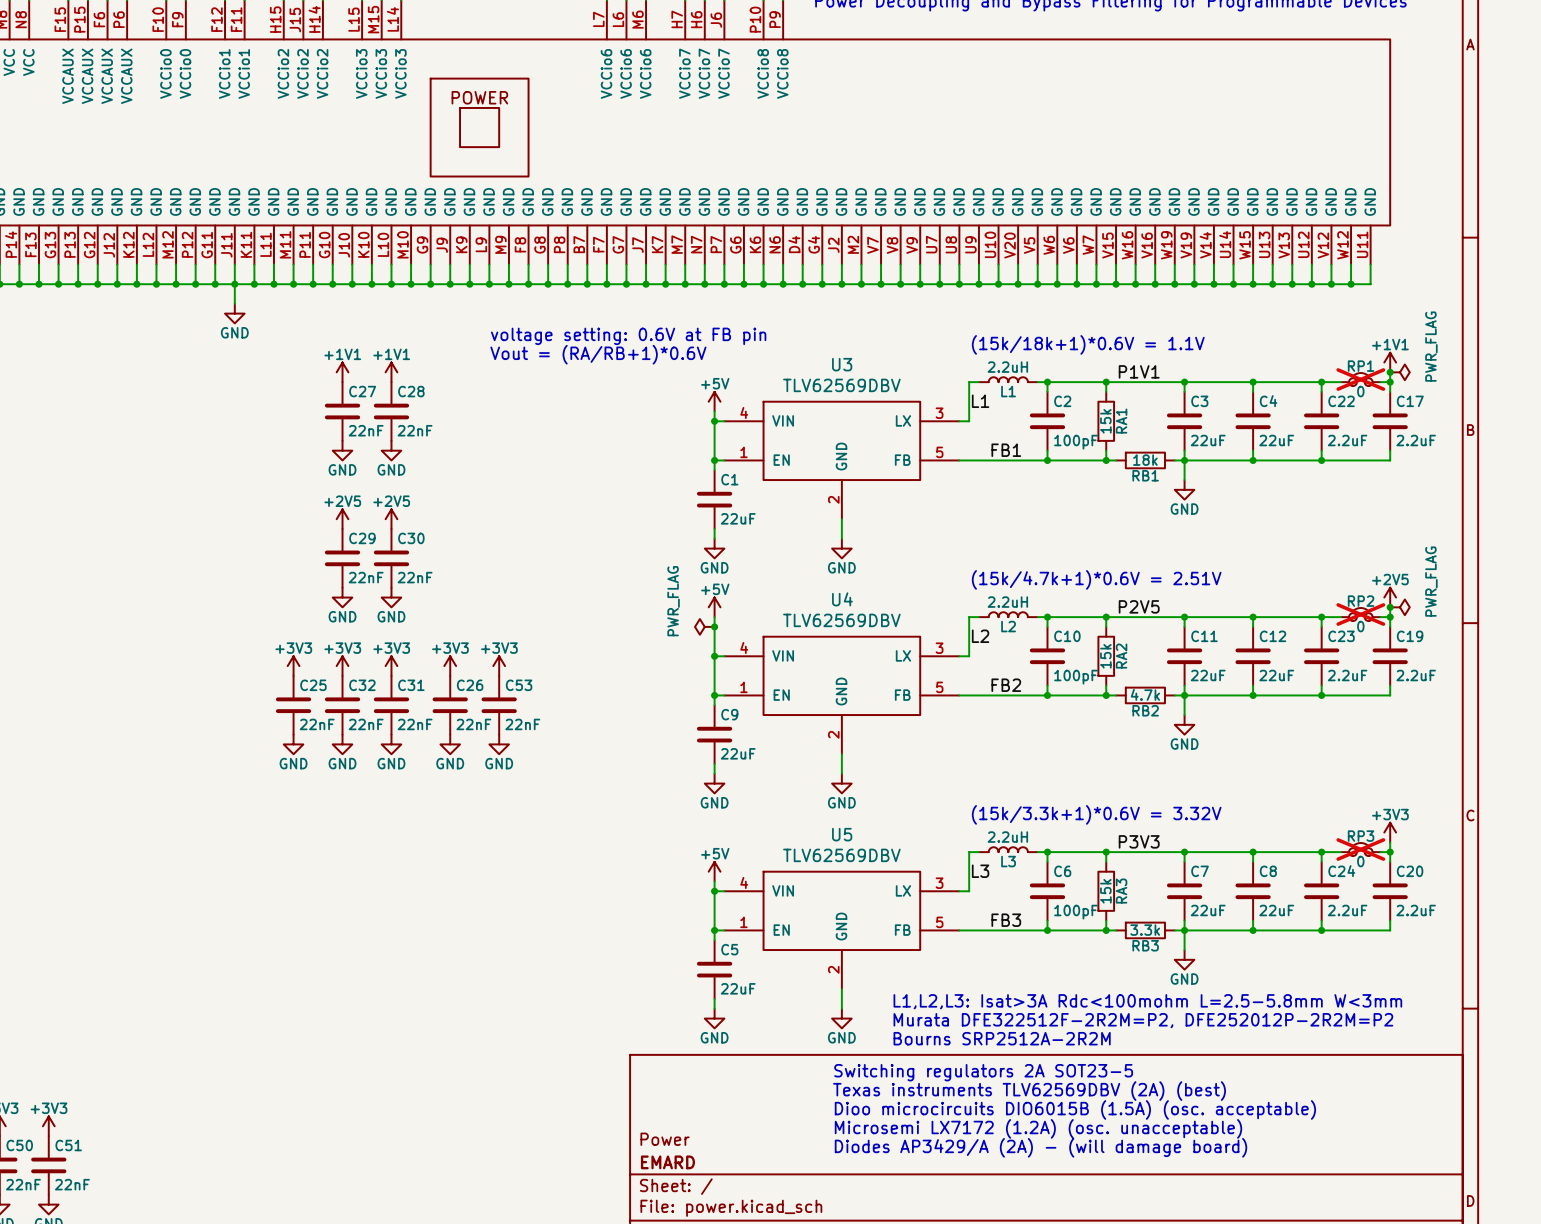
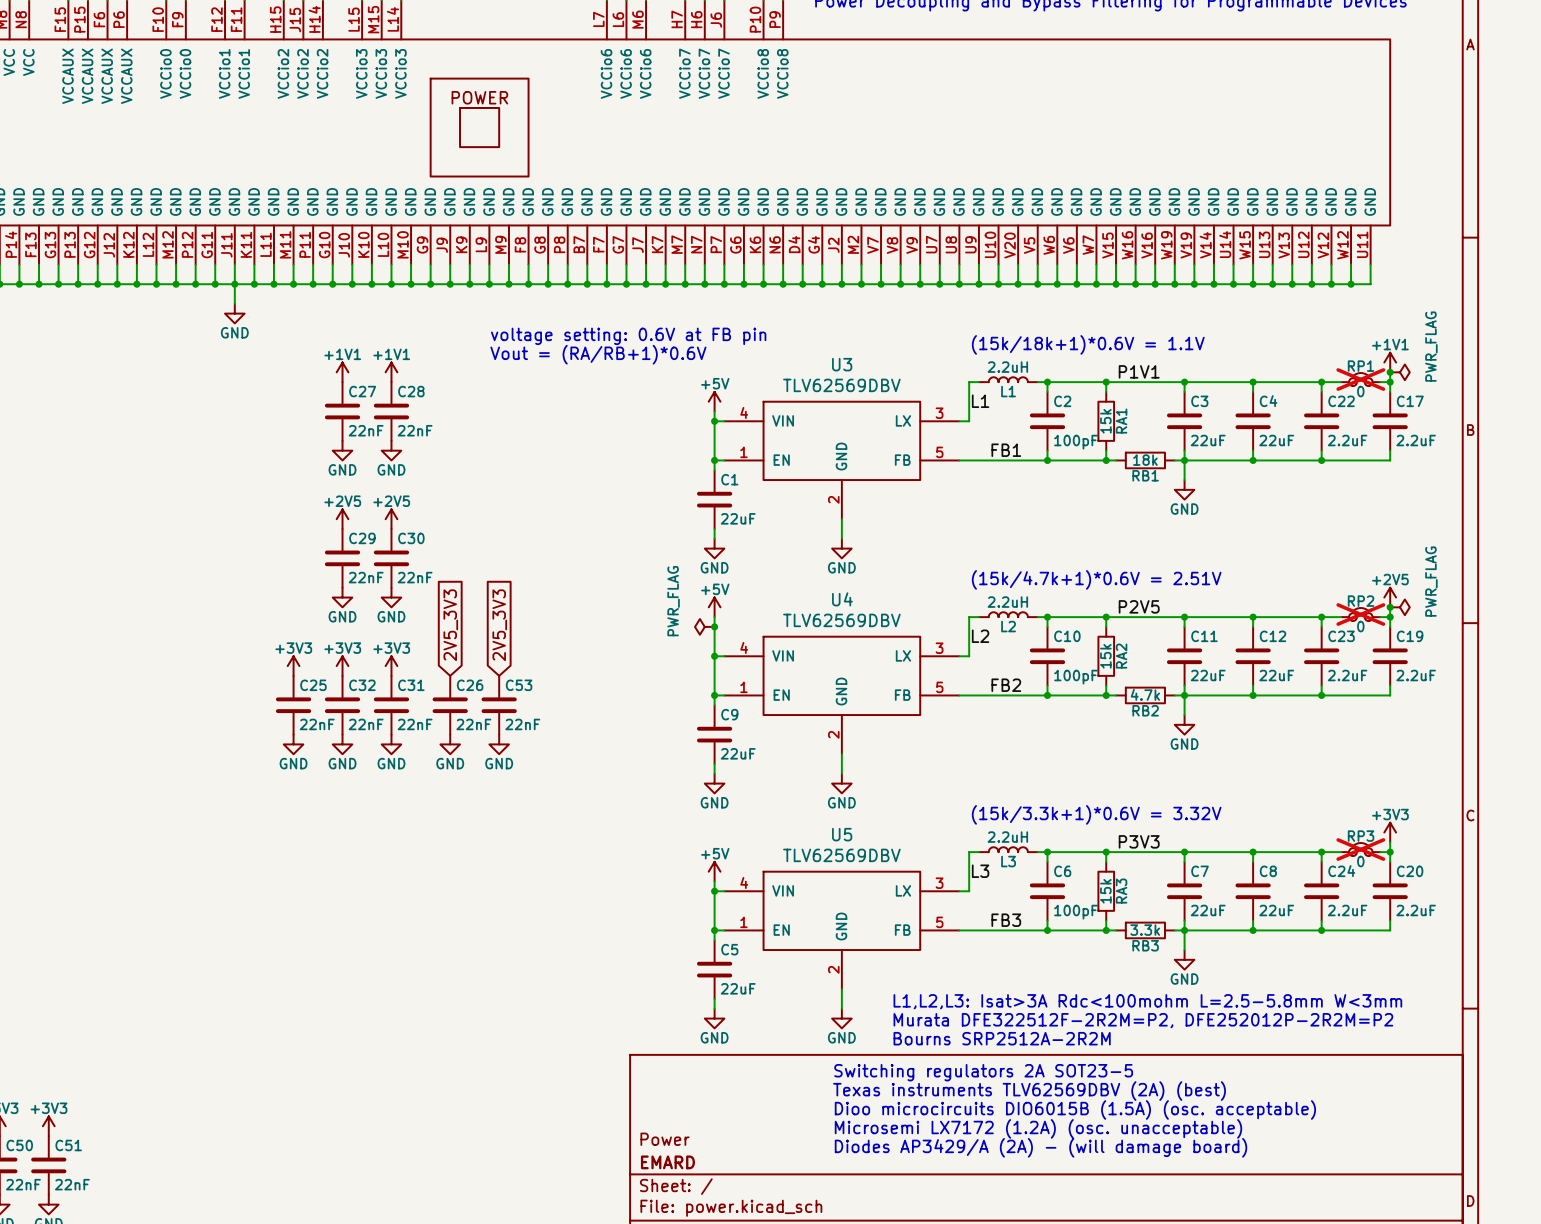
global label: none -> 2V5_3V3 (450, 625)
global label: none -> 2V5_3V3 (499, 625)
power symbol: +3V3 (450, 666) -> none
power symbol: +3V3 (499, 666) -> none

